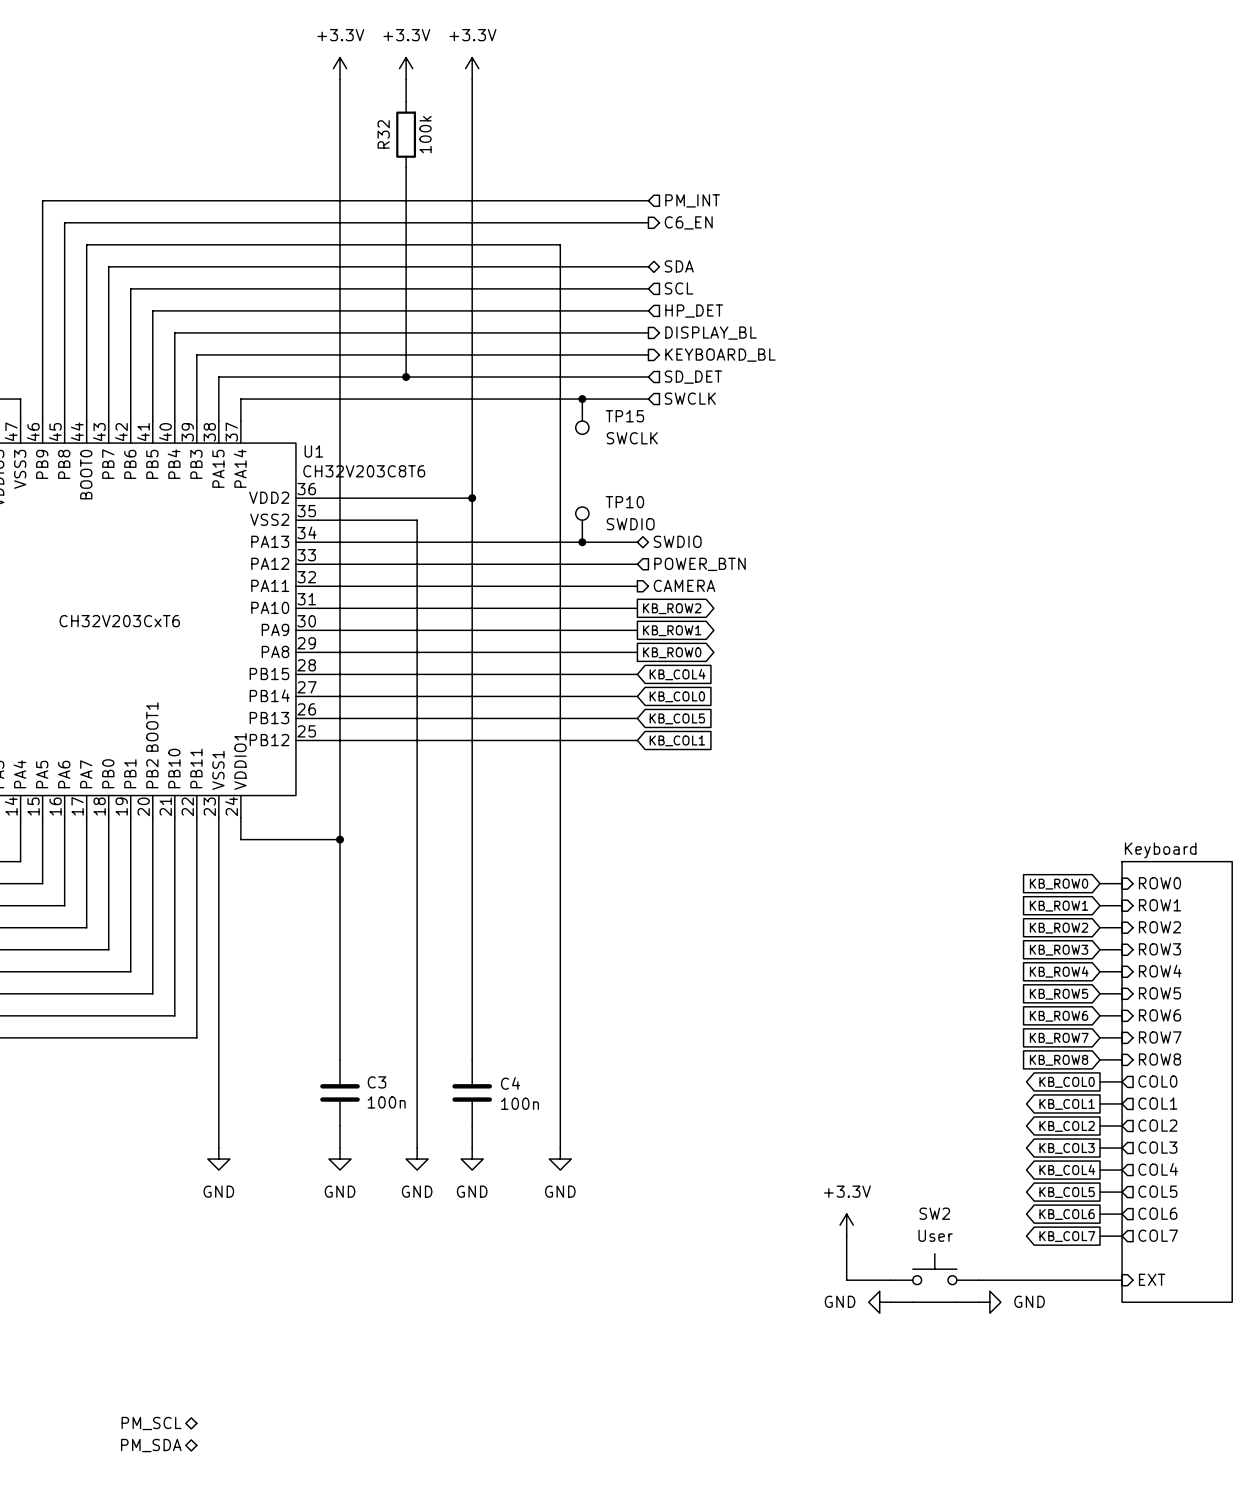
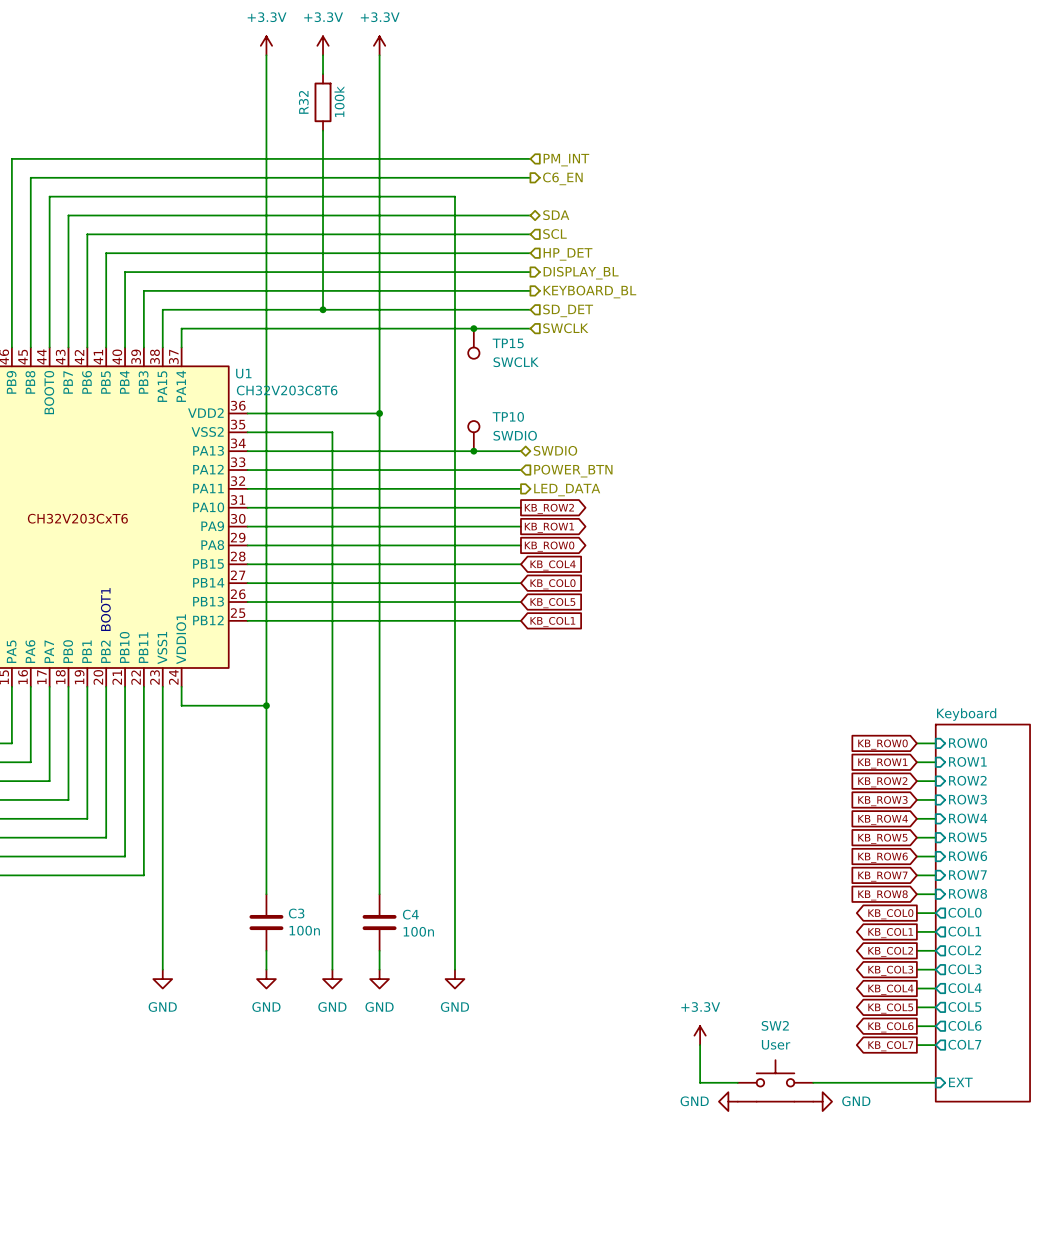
hierarchical label: CAMERA (684, 585) -> LED_DATA (567, 490)
hierarchical label: PM_SCL (151, 1423) -> none
hierarchical label: PM_SDA (151, 1445) -> none

